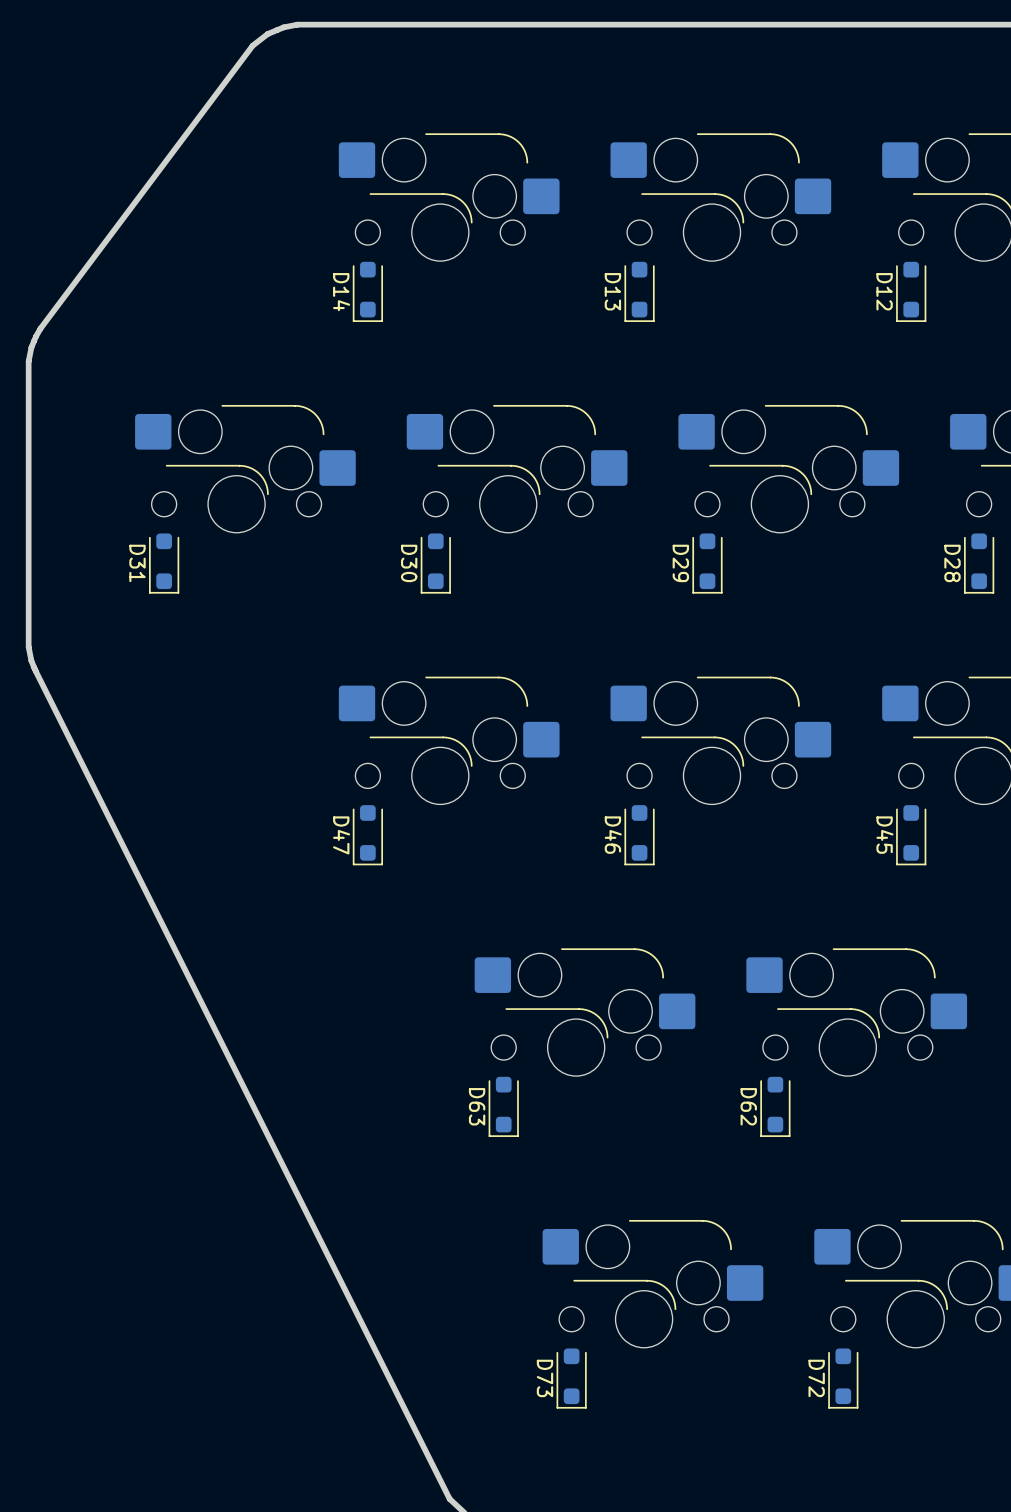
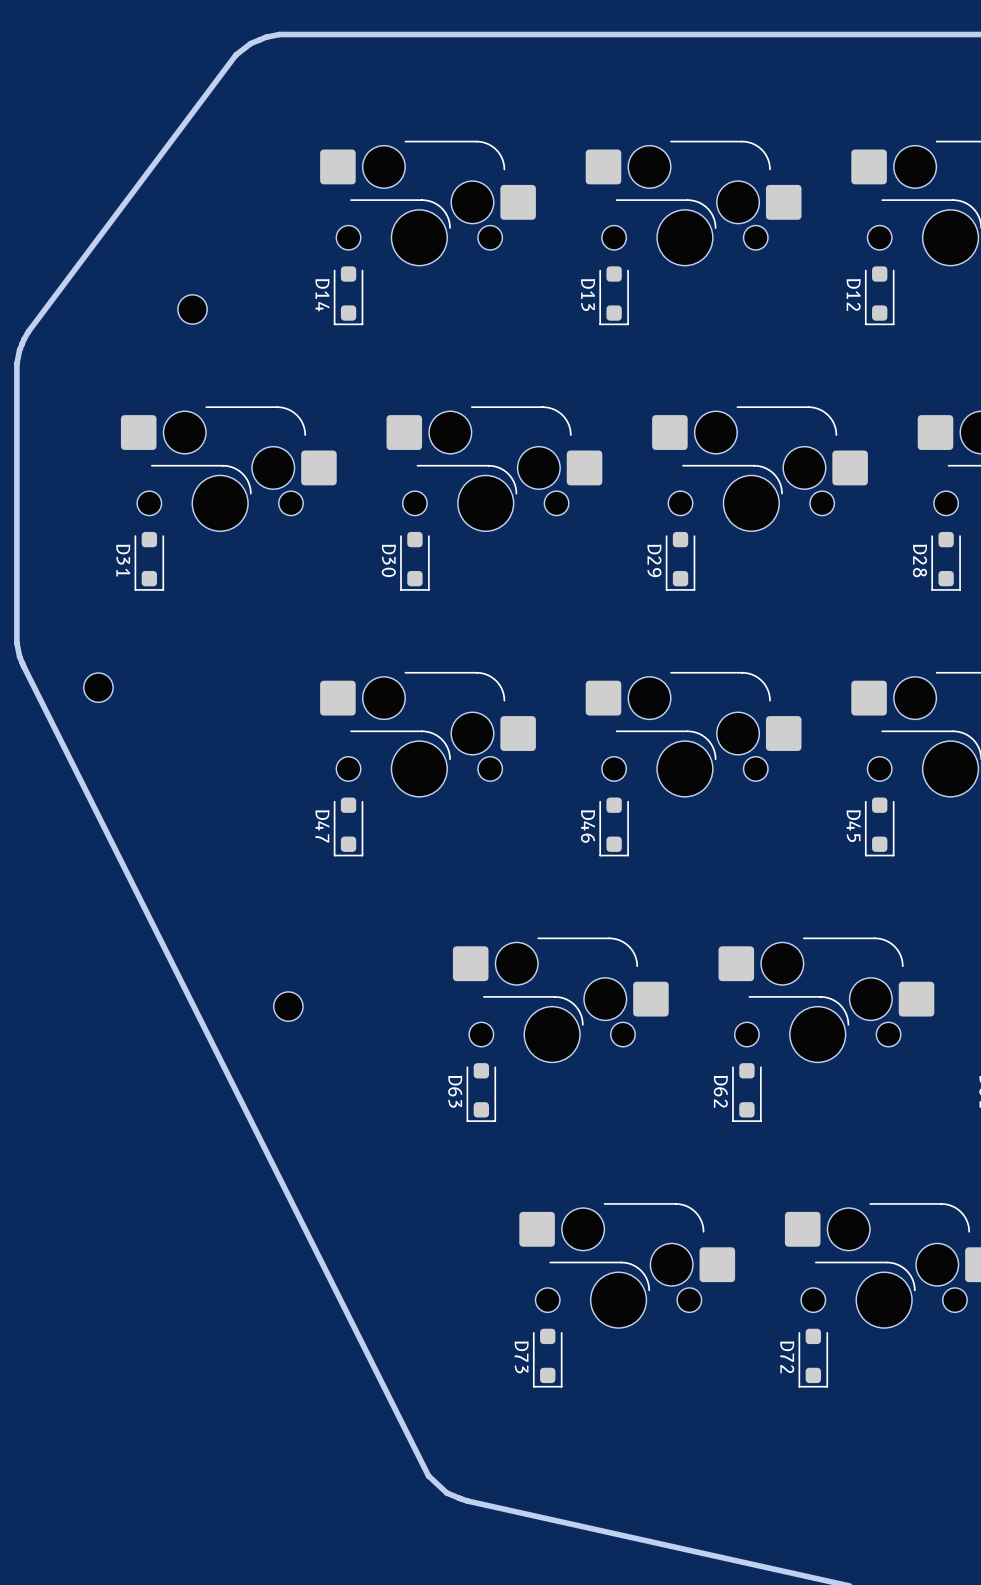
part: none -> (192, 309)
part: none -> (98, 687)
part: none -> (288, 1006)

